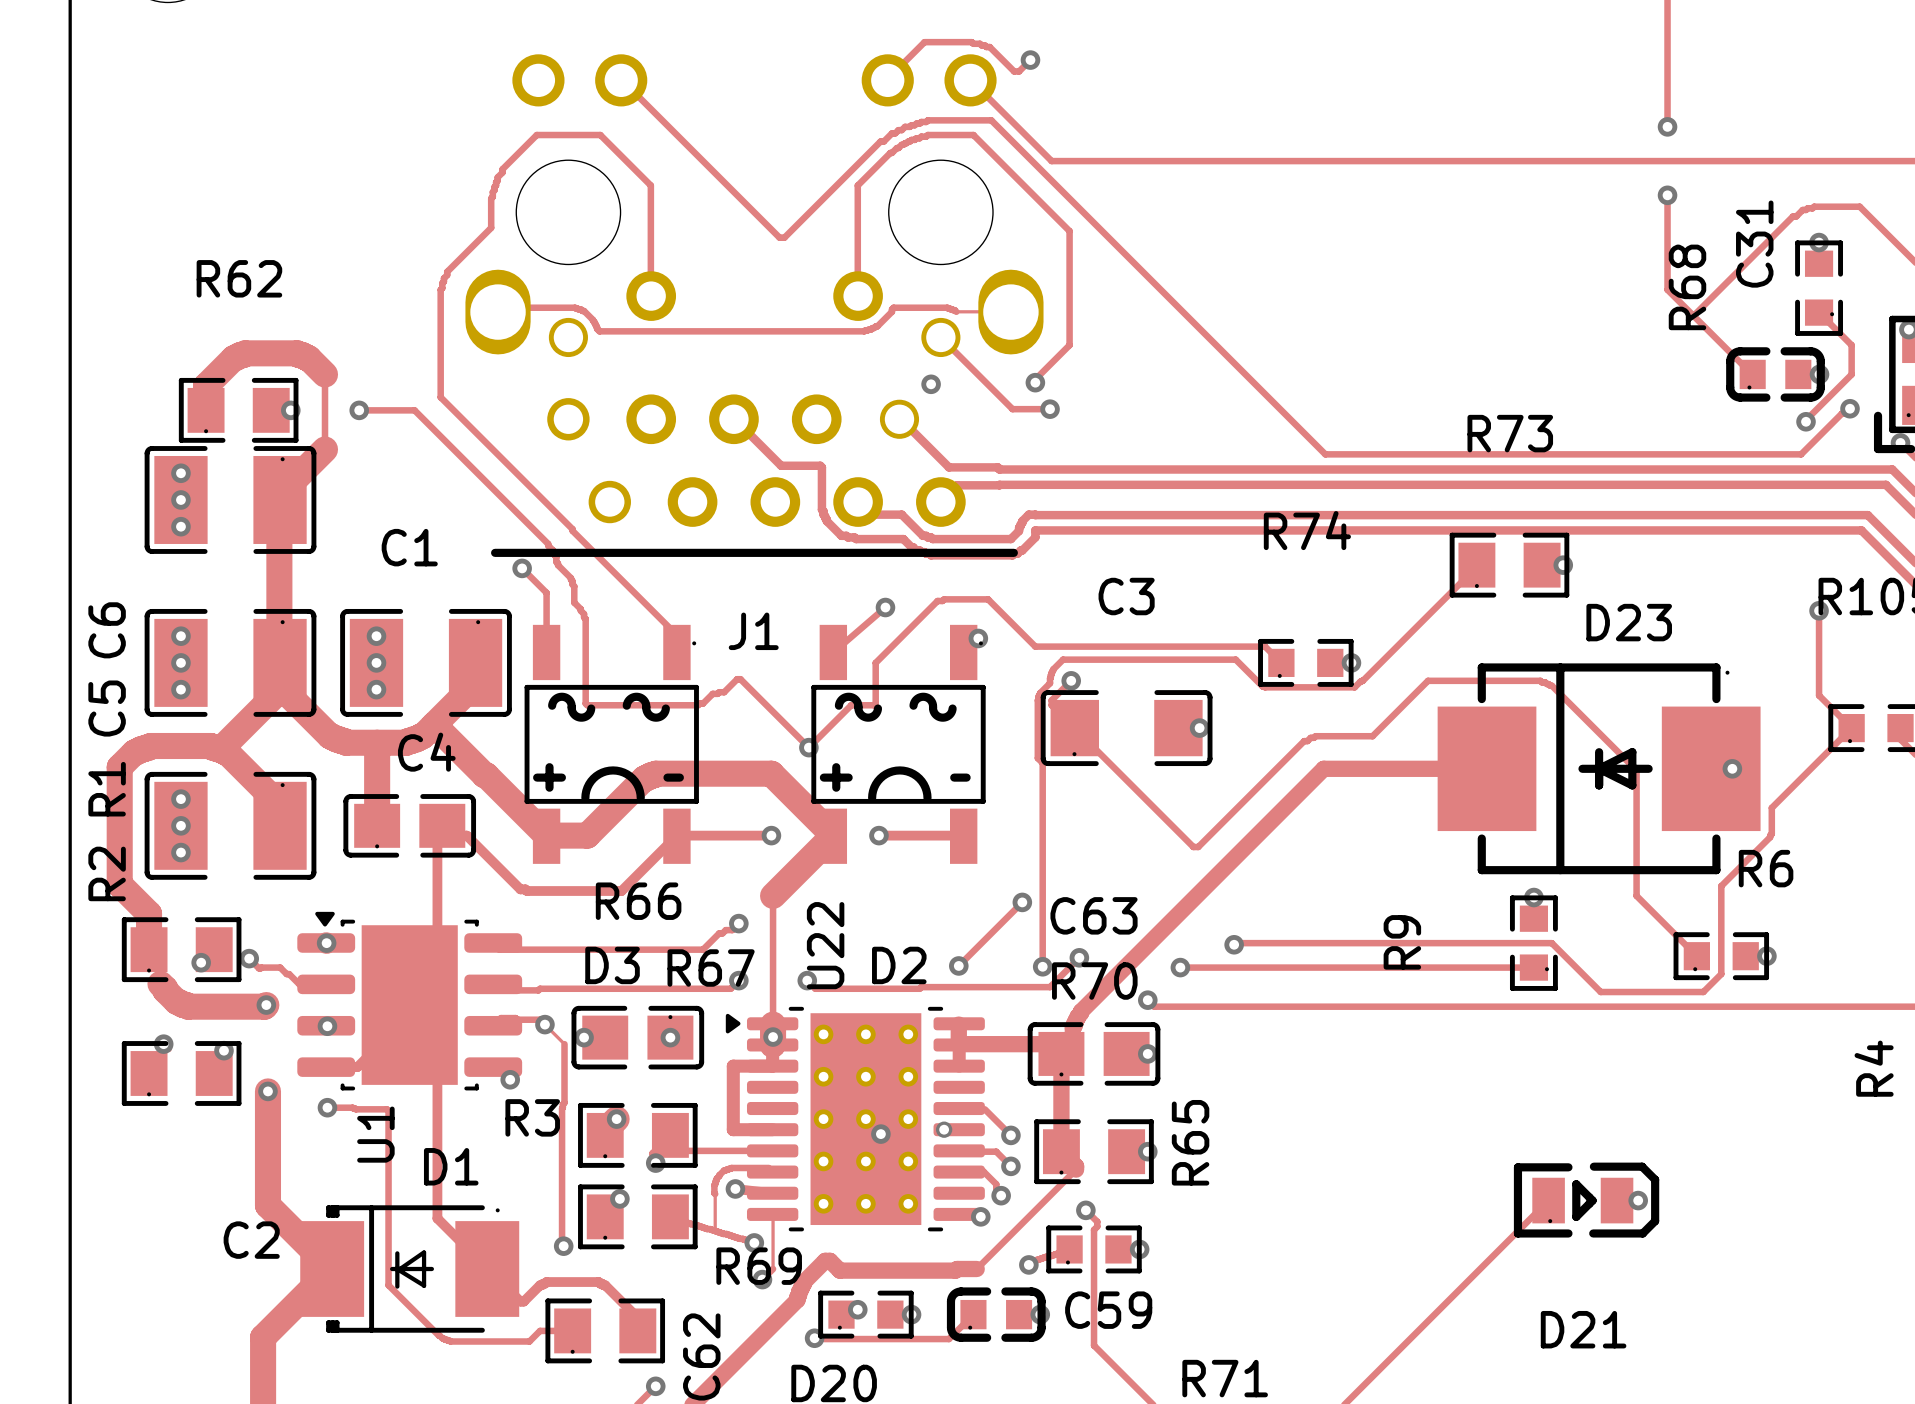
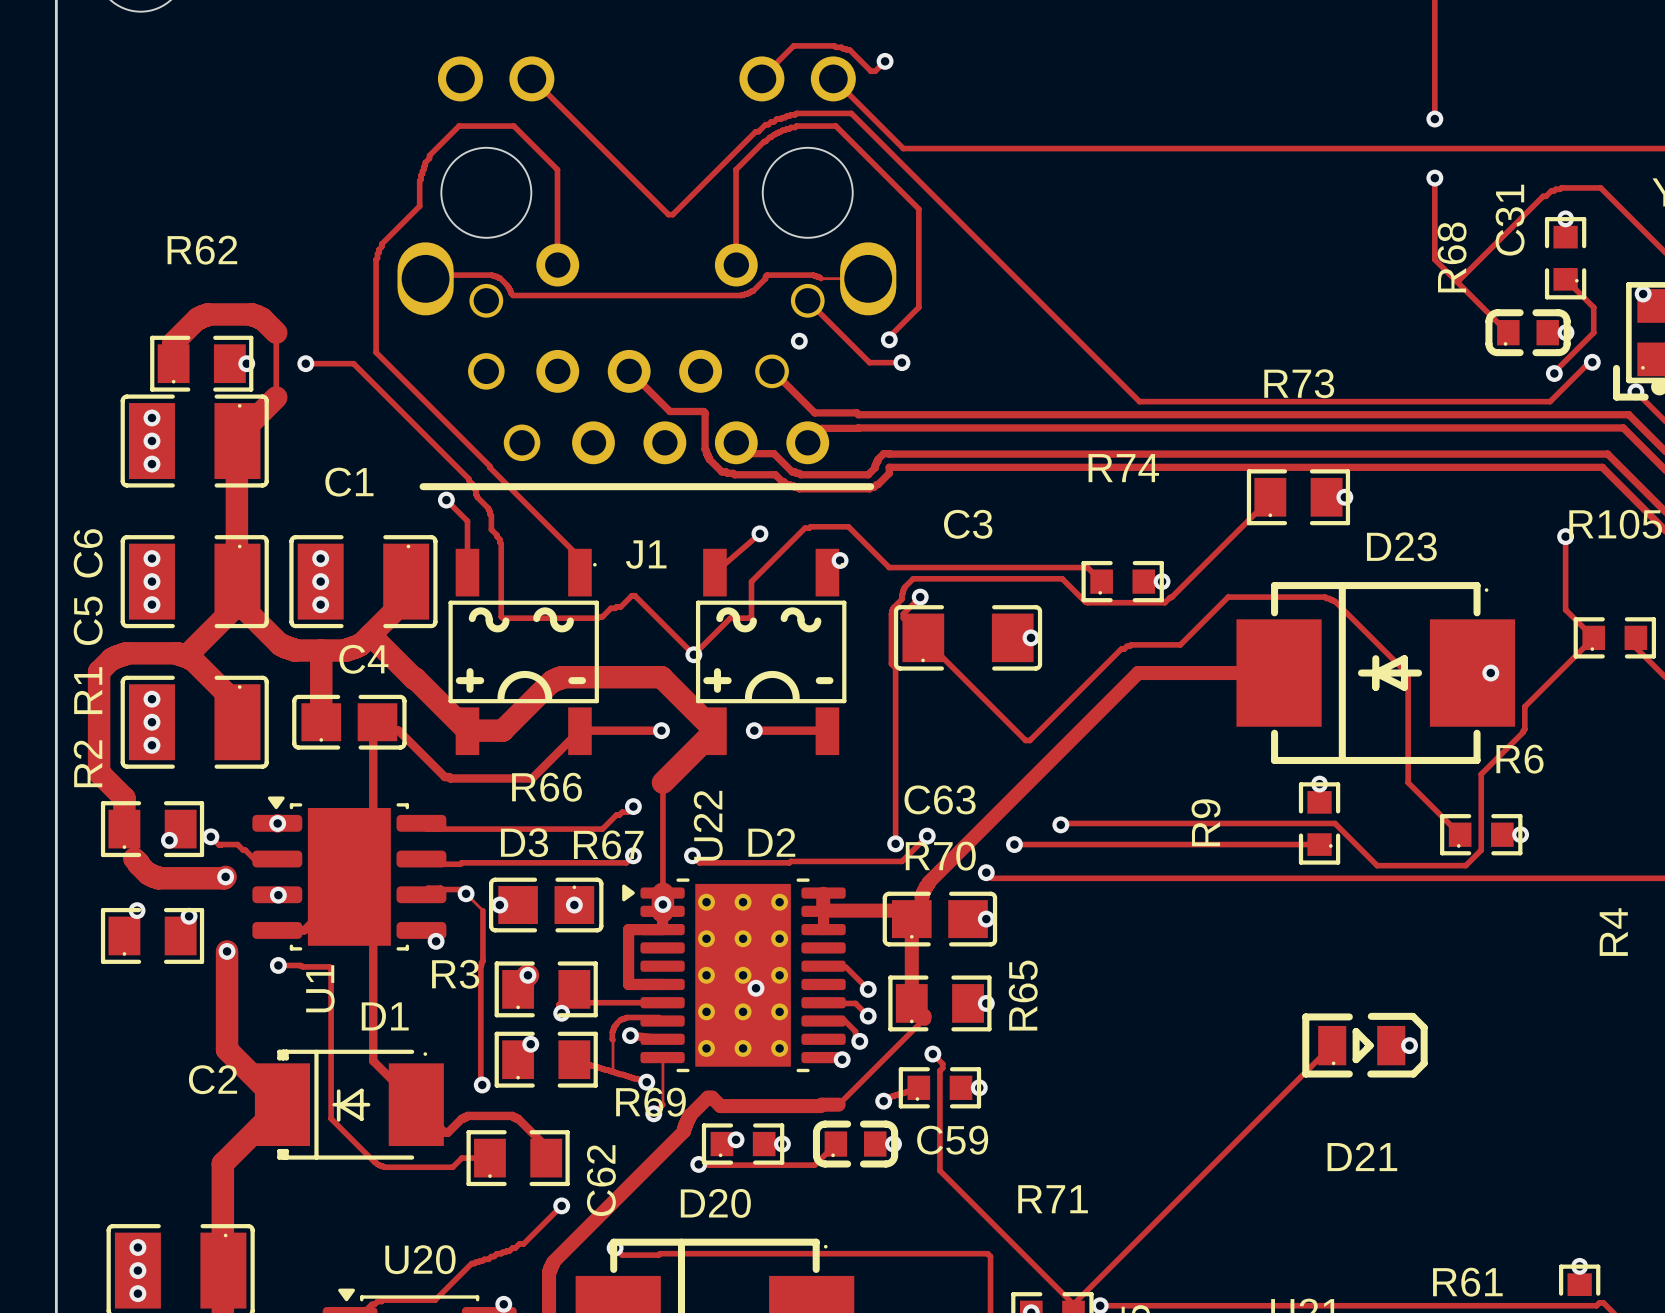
track: (1022, 902) (958, 965) -> none
via: (1022, 902) -> none
via: (958, 965) -> none
via: (944, 1129) -> none

